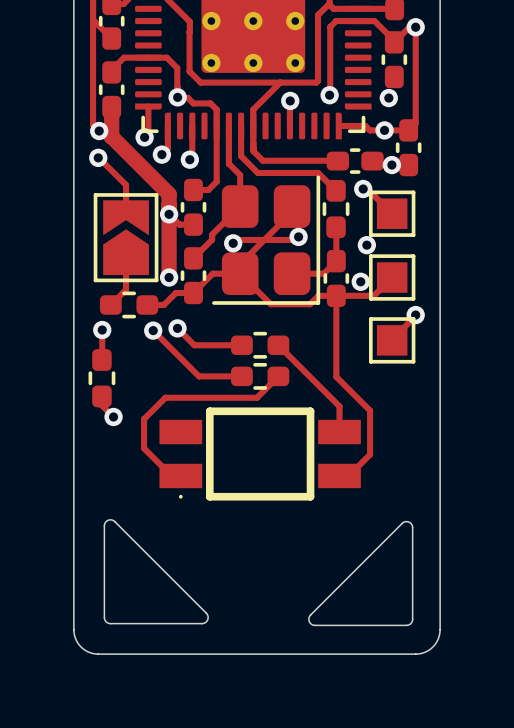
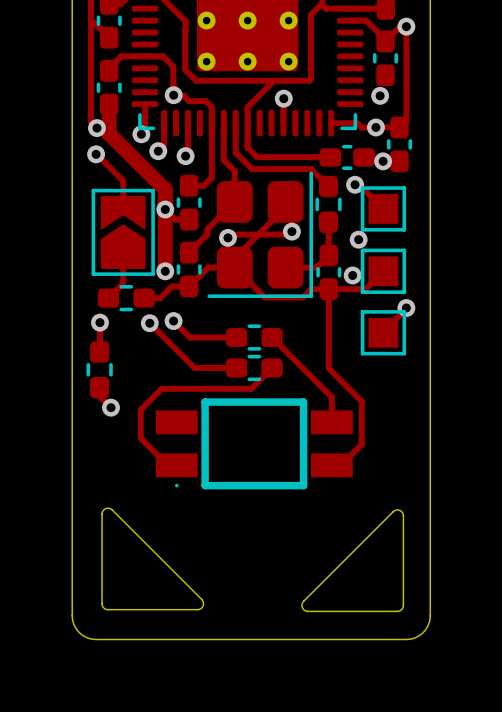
track: (358, 21) (336, 21) (330, 26) (329, 95) -> none
via: (329, 95) -> none

